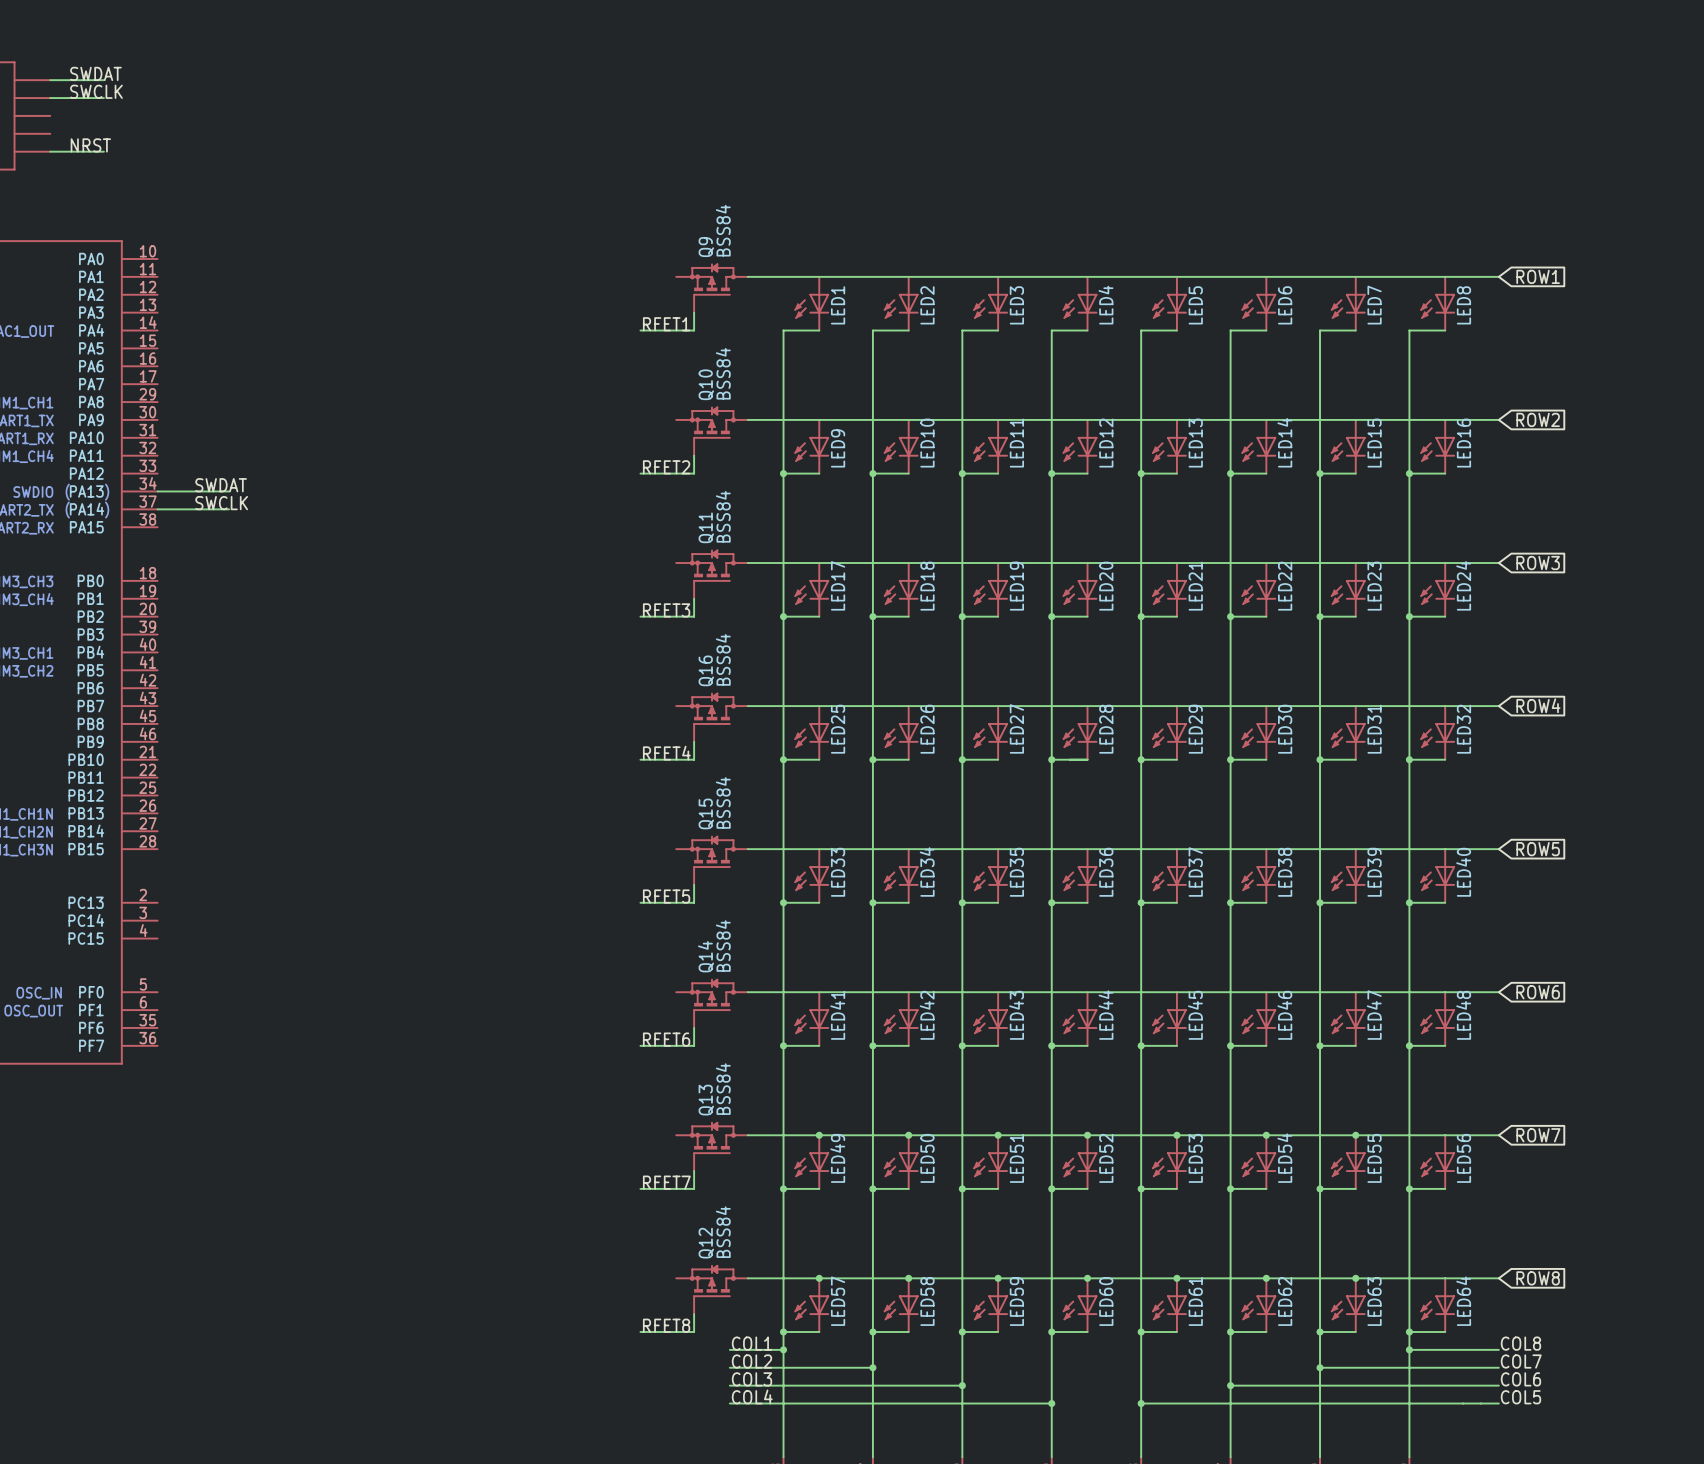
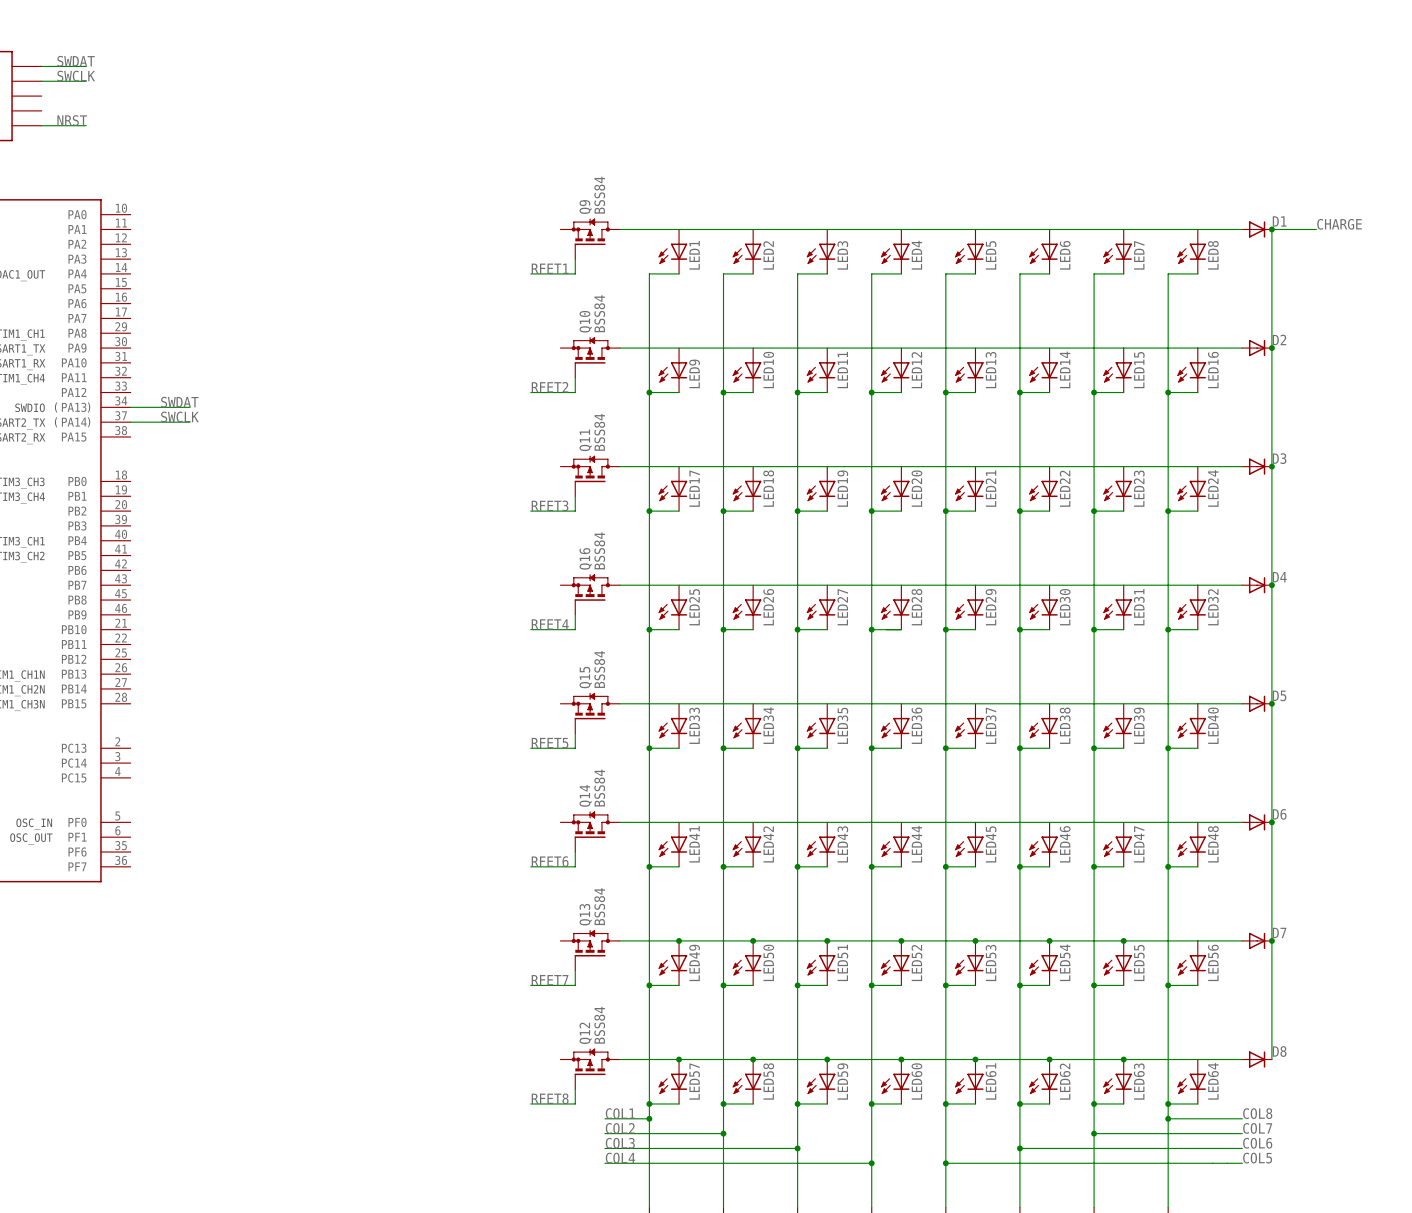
label: none -> CHARGE (1339, 224)
D1: none -> (1257, 229)
junction: none -> (1271, 229)
global label: ROW1 (1538, 276) -> none
wire: none -> (1316, 229) (1271, 229) (1271, 1059)
D2: none -> (1257, 348)
junction: none -> (1271, 348)
global label: ROW2 (1538, 419) -> none
D3: none -> (1257, 466)
junction: none -> (1271, 466)
global label: ROW3 (1538, 563) -> none
global label: ROW4 (1538, 705) -> none
D4: none -> (1257, 585)
junction: none -> (1271, 585)
D5: none -> (1257, 703)
junction: none -> (1271, 703)
global label: ROW5 (1538, 849) -> none
D6: none -> (1257, 822)
junction: none -> (1271, 822)
global label: ROW6 (1538, 992) -> none
D7: none -> (1257, 940)
junction: none -> (1271, 940)
global label: ROW7 (1538, 1135) -> none
D8: none -> (1257, 1059)
global label: ROW8 (1538, 1278) -> none

